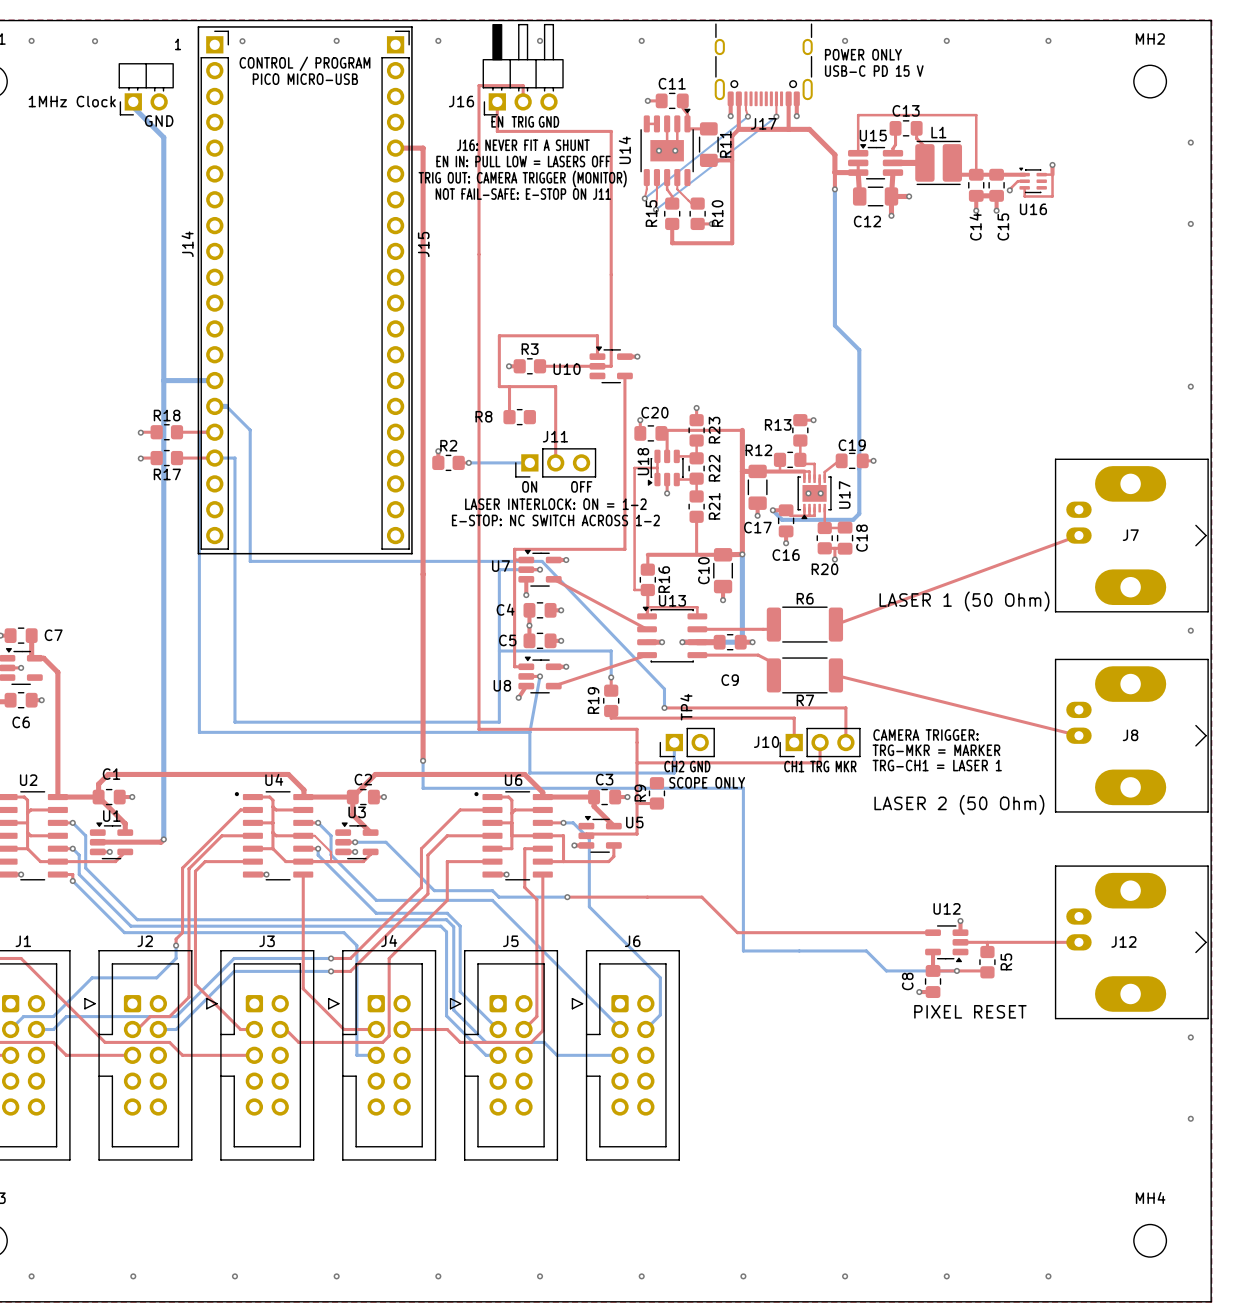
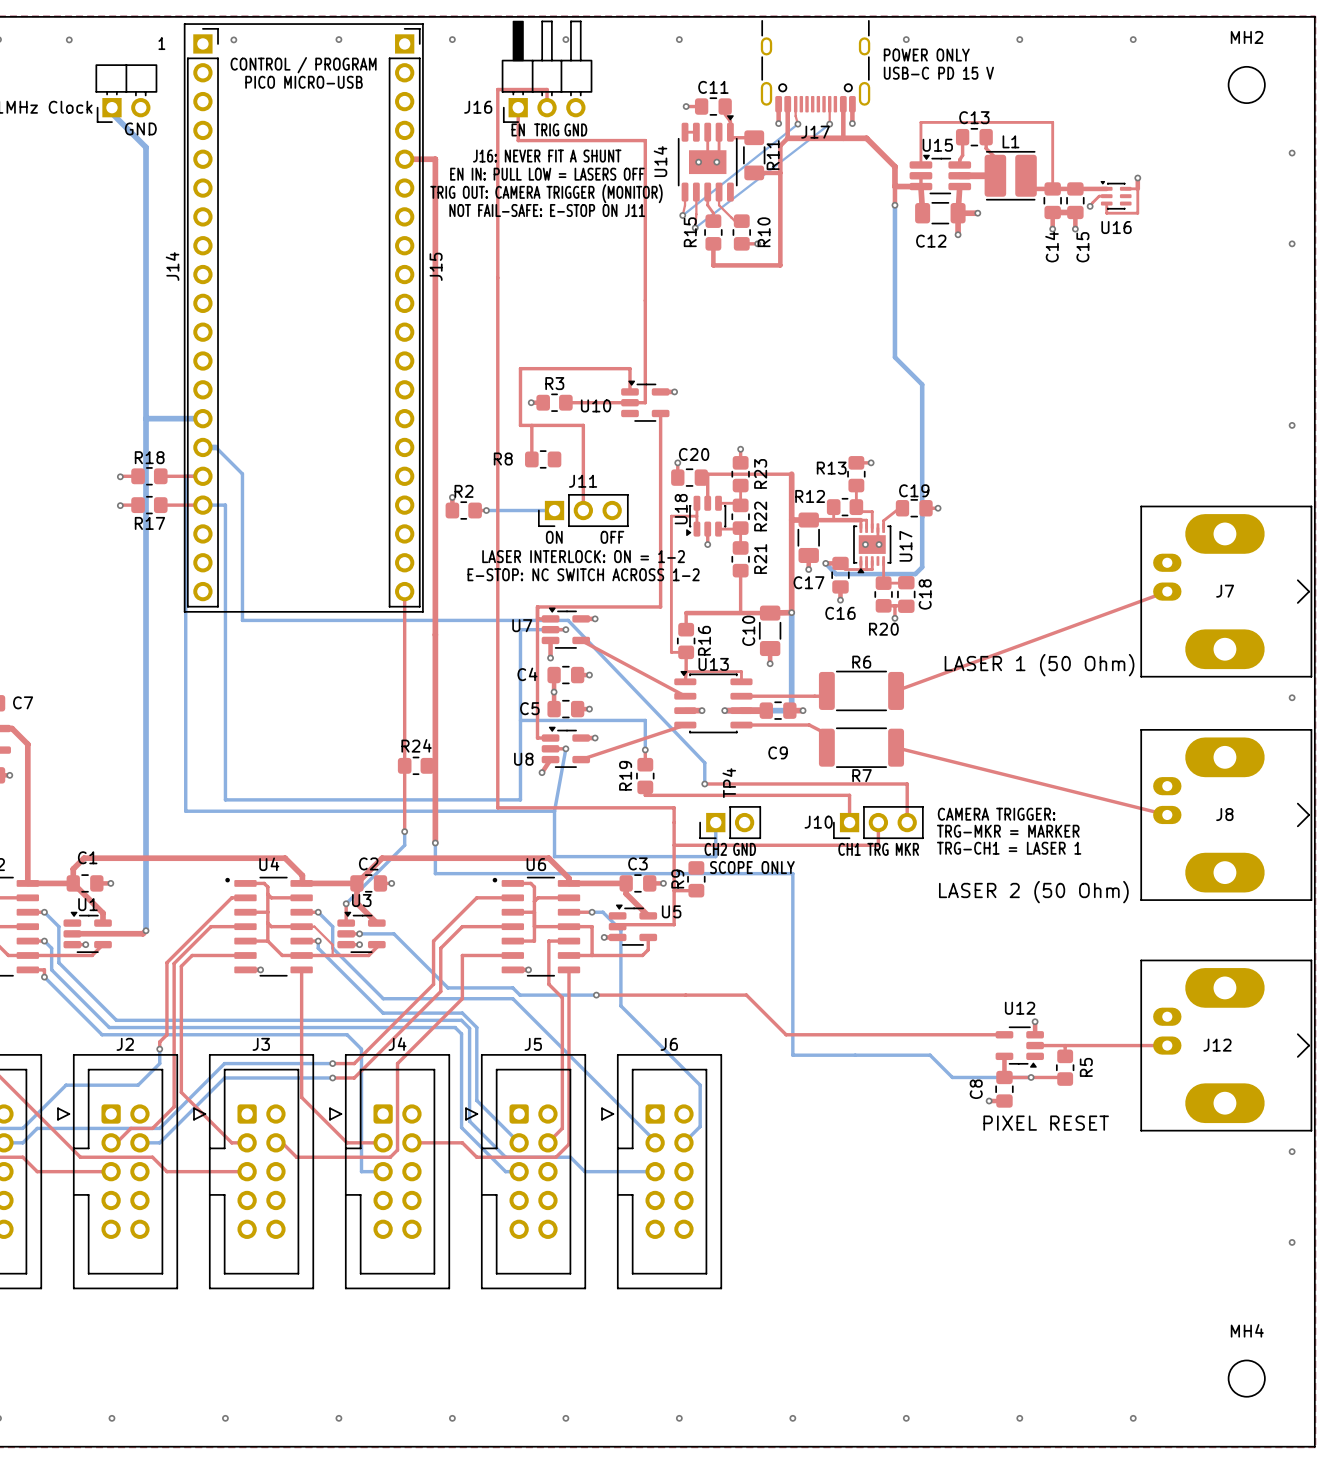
top track: none -> (404, 591) (404, 831)
R24: none -> (416, 765)
bottom track: none -> (404, 831) (404, 845) (346, 903)
via: none -> (404, 831)
top track: none -> (346, 903) (346, 923)
via: none -> (346, 903)

